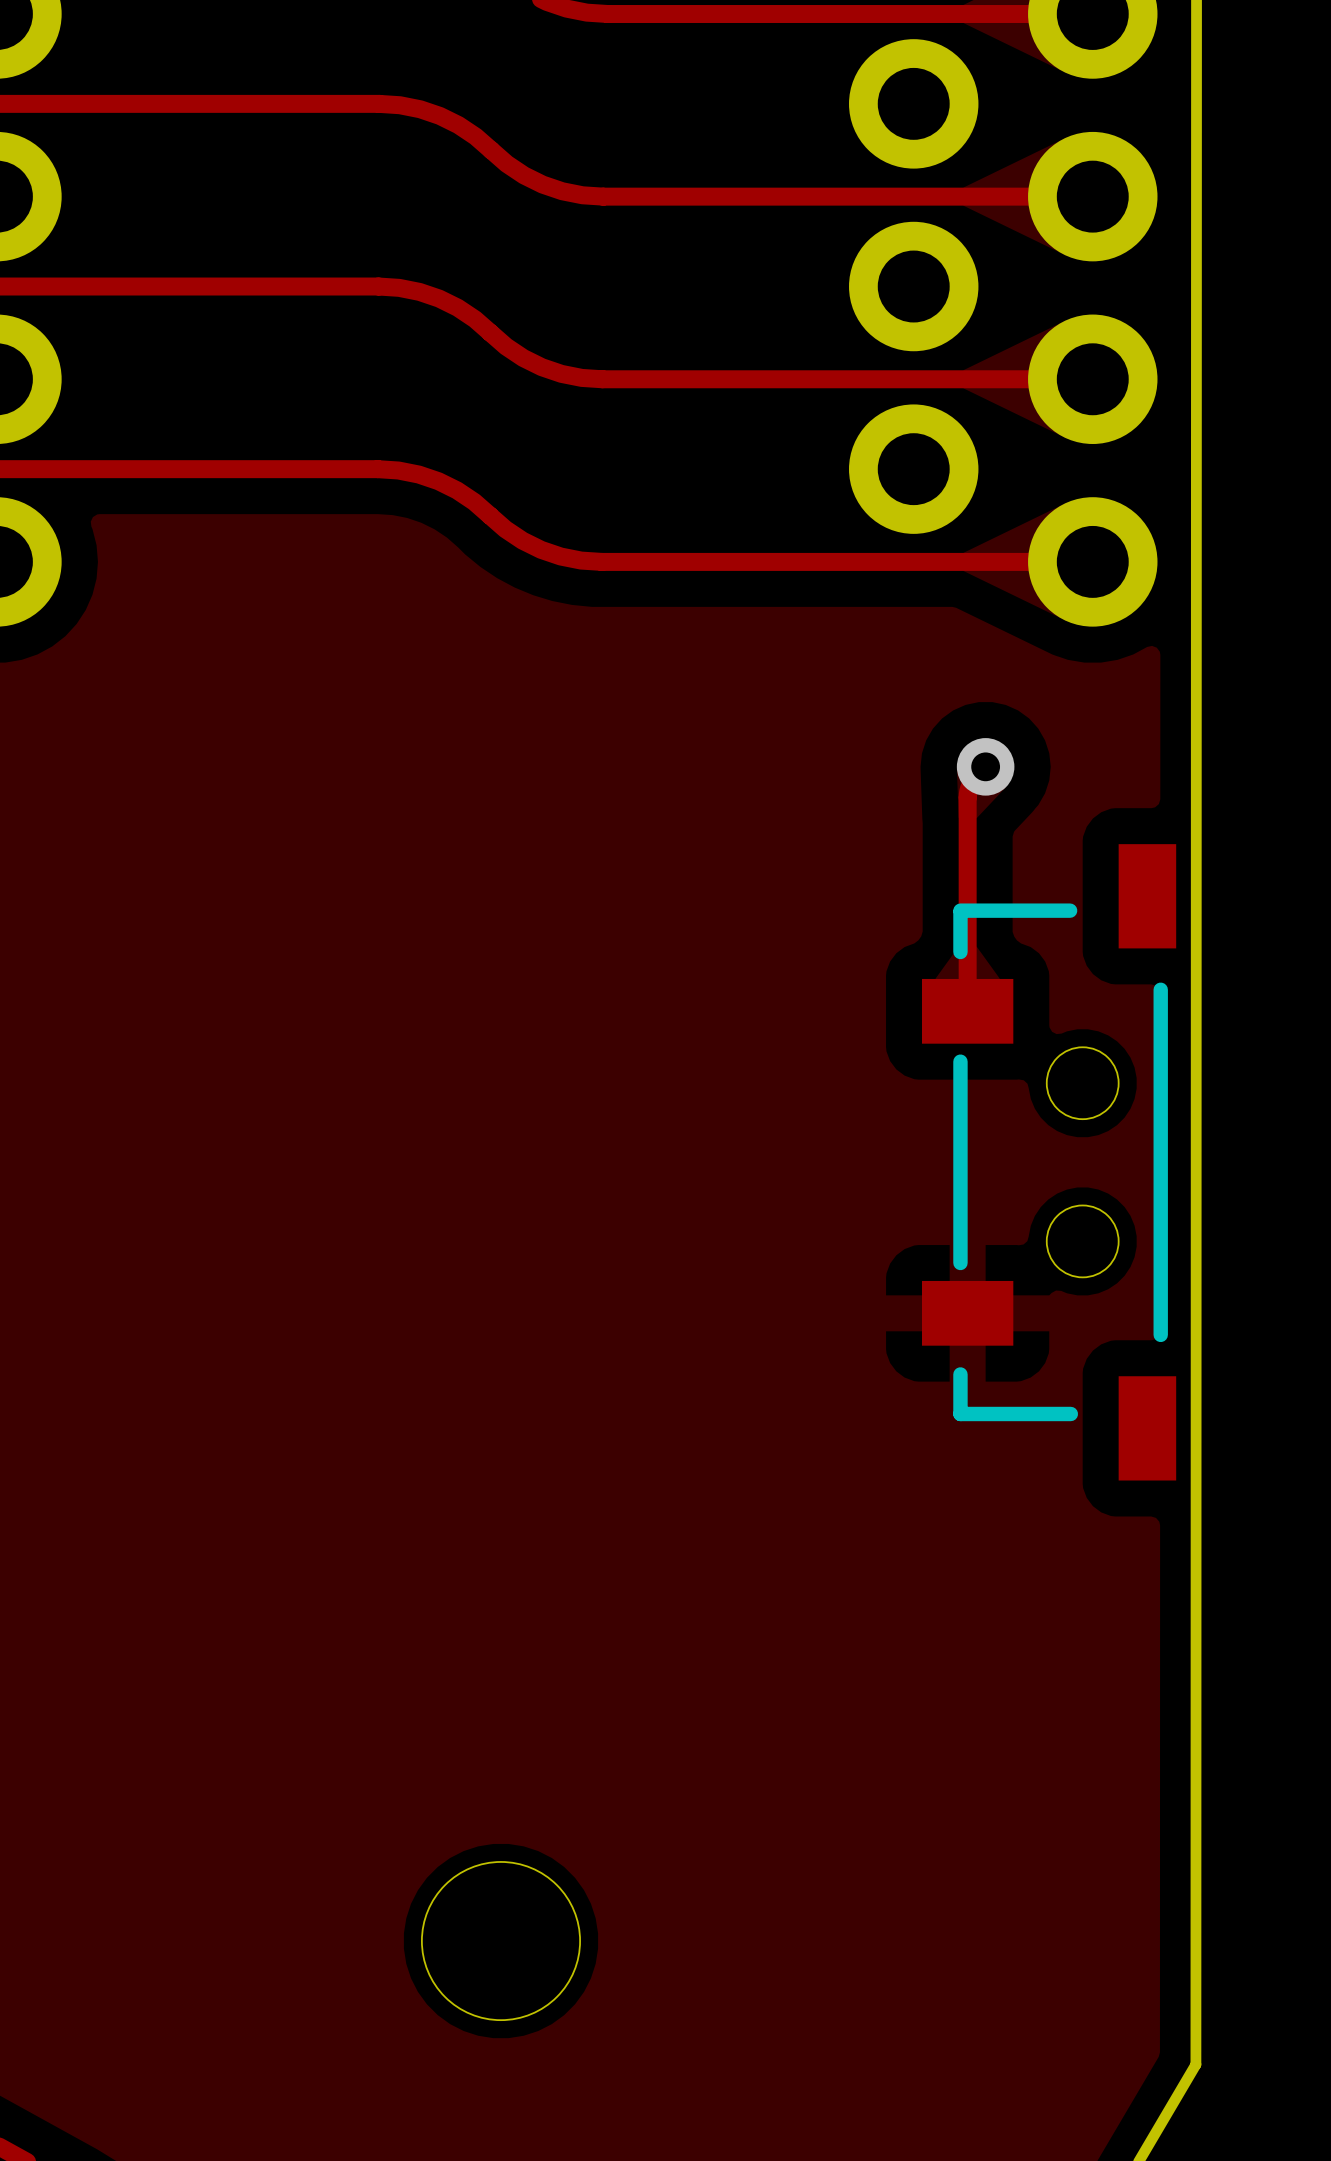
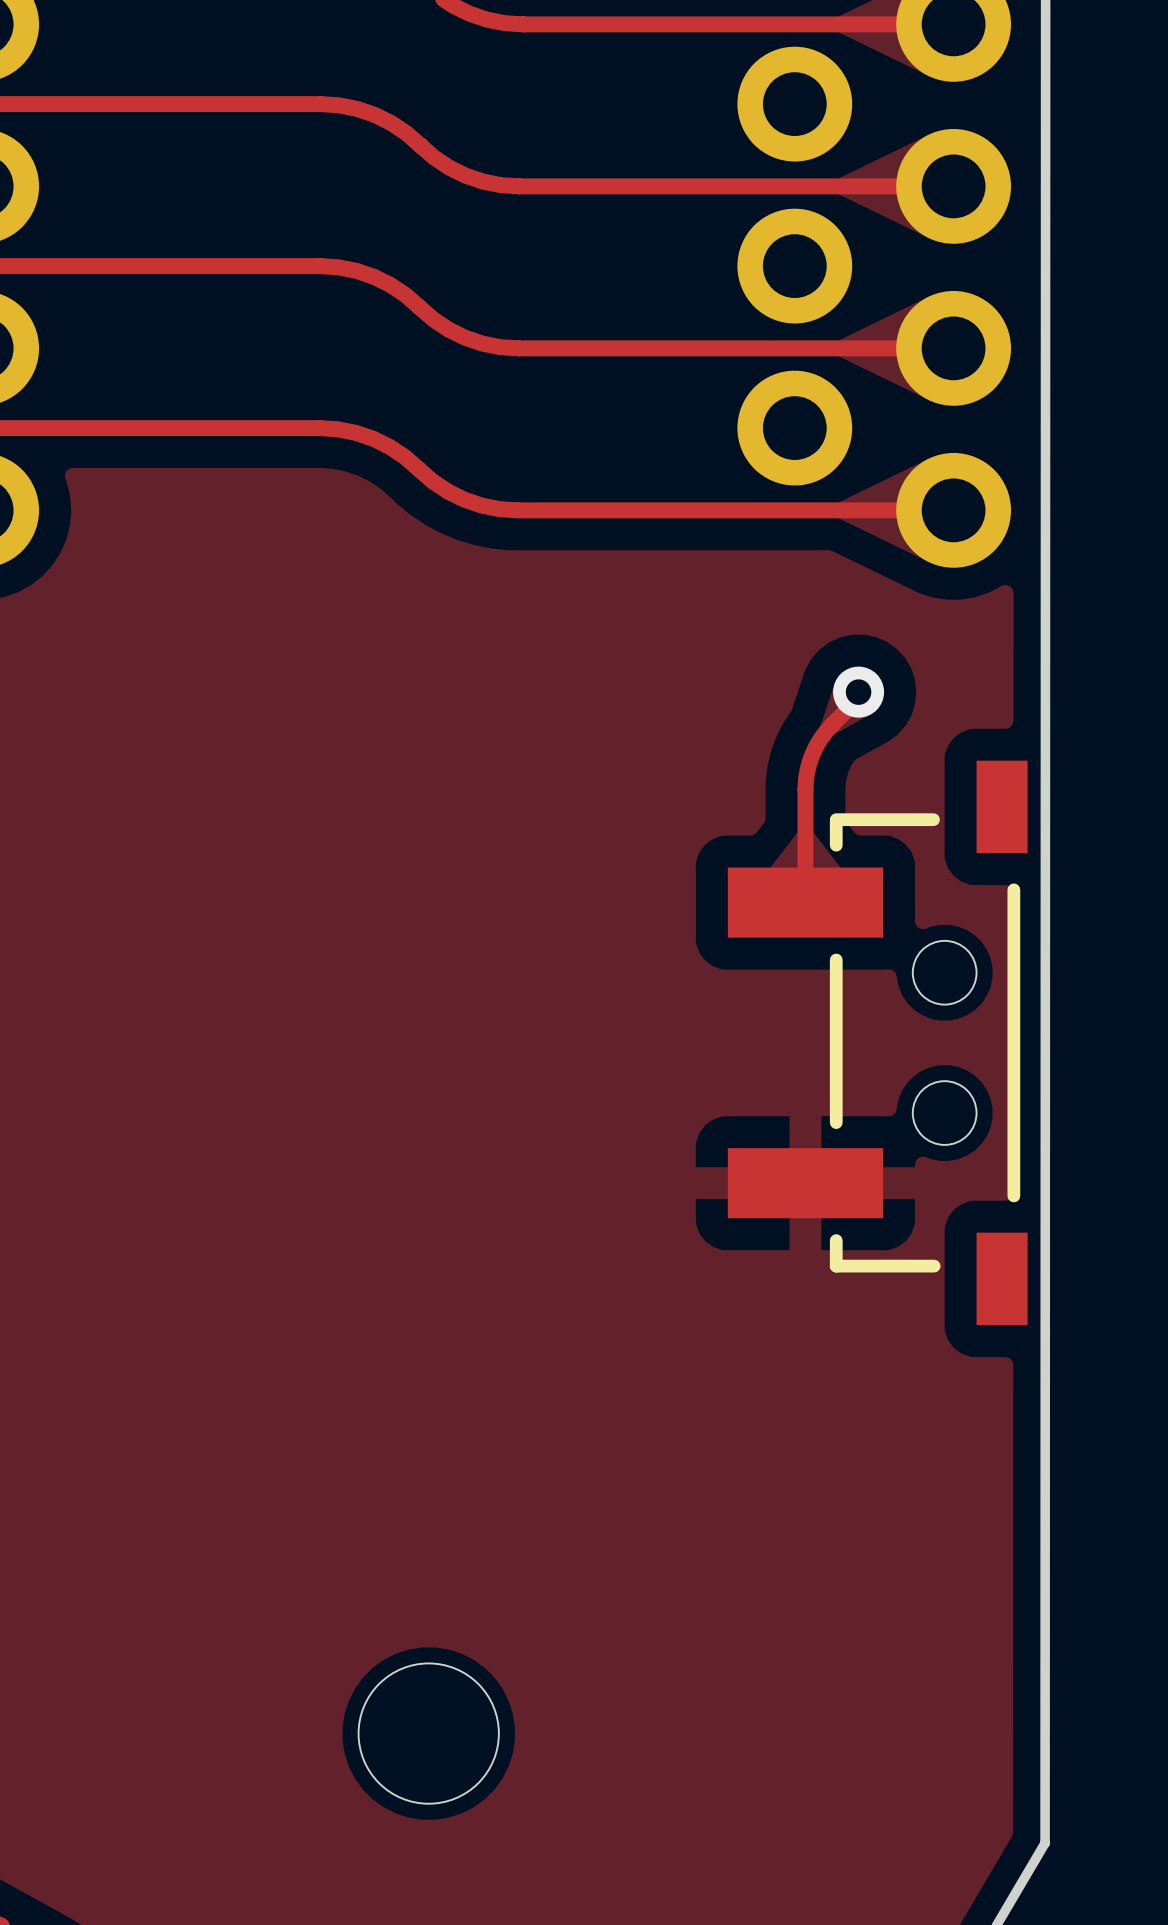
track: (985, 766) (972, 780) (967, 794) (967, 1011) -> (858, 692) (856, 699) (820, 738) (809, 762) (805, 789) (805, 902)
part footprint: [921, 844, 1177, 1481] -> [727, 760, 1028, 1326]

